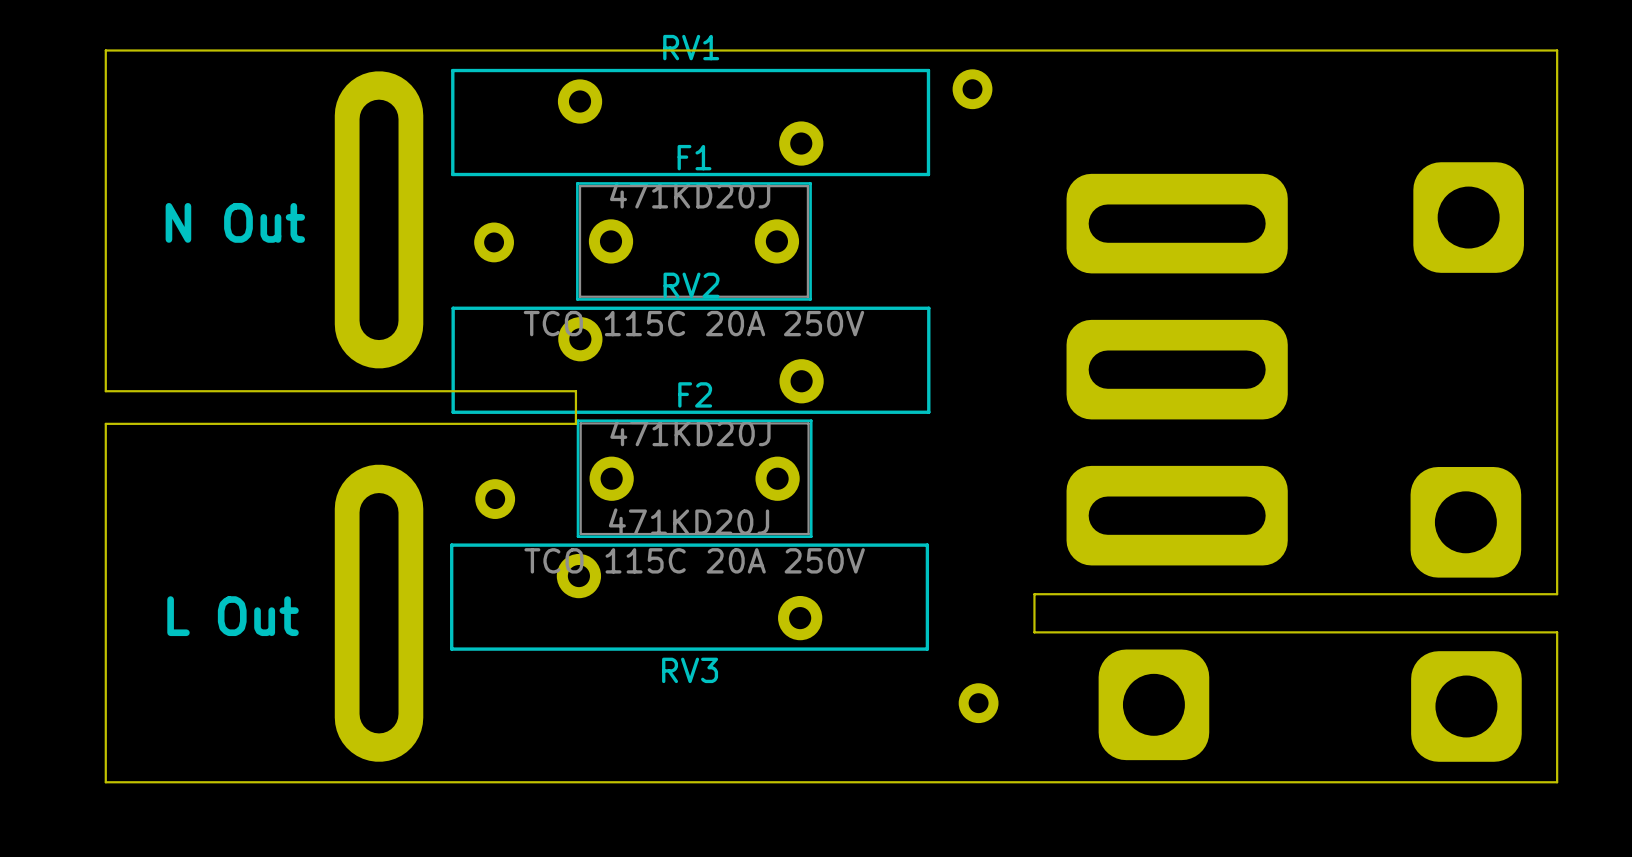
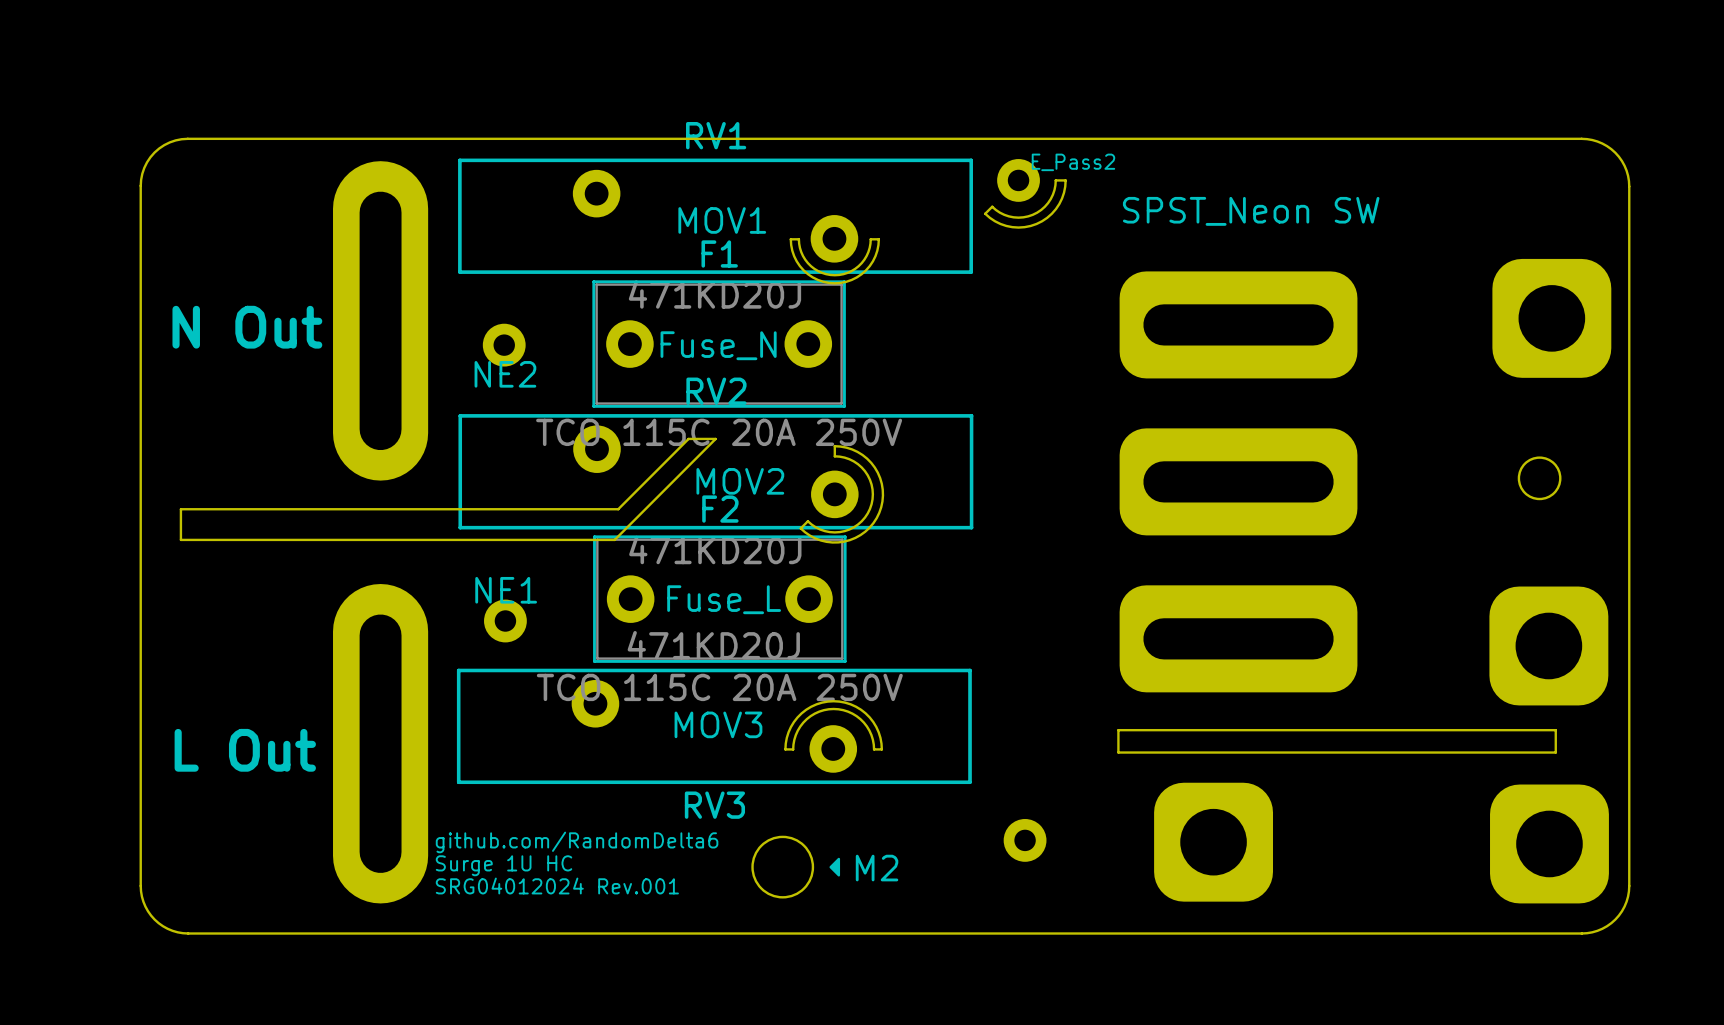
board edge: (1496, 50) (1557, 50) (1557, 594) (1034, 594) (1034, 632) (1557, 632) (1557, 782) (105, 782) (105, 423) (575, 423) (575, 391) (105, 391) (105, 50) (199, 50) -> (140, 185) (144, 167) (154, 152) (169, 142) (187, 138)
board edge: none -> (1581, 138) (1602, 143) (1615, 152) (1626, 170) (1629, 186)
text: none -> E_Pass2 (1073, 162)
board edge: none -> (1065, 180) (1055, 180) (1052, 194) (1048, 203) (1032, 214) (1023, 217) (1008, 216) (992, 206) (985, 213) (1000, 223) (1012, 227) (1024, 227) (1036, 223) (1047, 217) (1059, 204) (1064, 192) (1065, 180)
board edge: none -> (140, 185) (140, 885) (141, 896) (148, 911) (158, 923) (167, 928) (188, 933) (1581, 933)
board edge: none -> (1629, 186) (1628, 891) (1624, 906) (1615, 919) (1597, 930) (1581, 933)
text: none -> SPST_Neon SW (1251, 211)
text: none -> MOV1 (722, 220)
board edge: none -> (878, 239) (870, 239) (868, 252) (858, 266) (847, 272) (834, 275) (822, 272) (811, 266) (801, 252) (798, 239) (790, 239) (794, 256) (803, 270) (817, 279) (834, 283) (851, 279) (865, 270) (875, 256) (878, 239)
text position: N Out (235, 222) -> N Out (247, 327)
text: none -> Fuse_N (718, 345)
text: none -> NE2 (505, 374)
board edge: none -> (715, 438) (614, 539) (180, 539) (180, 509) (618, 509) (688, 438) (715, 438)
board edge: none -> (834, 446) (834, 456) (849, 459) (865, 471) (869, 479) (872, 494) (871, 504) (865, 517) (849, 529) (839, 532) (824, 531) (807, 521) (800, 528) (815, 538) (832, 542) (849, 540) (865, 531) (879, 512) (882, 495) (877, 472) (867, 458) (852, 449) (834, 446)
round board edge: none -> [1517, 456, 1562, 501]
text: none -> MOV2 (740, 481)
text: none -> NE1 (506, 590)
text: none -> Fuse_L (724, 599)
text: none -> MOV3 (718, 724)
board edge: none -> (1555, 730) (1555, 752) (1118, 752) (1118, 730) (1555, 730)
text position: L Out (233, 616) -> L Out (245, 750)
board edge: none -> (881, 749) (874, 749) (871, 735) (860, 719) (847, 711) (833, 708) (819, 711) (806, 719) (795, 735) (793, 749) (785, 749) (788, 732) (797, 717) (816, 704) (833, 701) (850, 704) (869, 717) (878, 732) (881, 749)
round board edge: none -> [751, 835, 815, 899]
text: none -> github.com/RandomDelta6 (577, 842)
drawing: none -> [829, 857, 841, 877]
text: none -> Surge 1U HC (504, 865)
text: none -> M2 (877, 868)
text: none -> SRG04012024 Rev.001 (557, 886)

